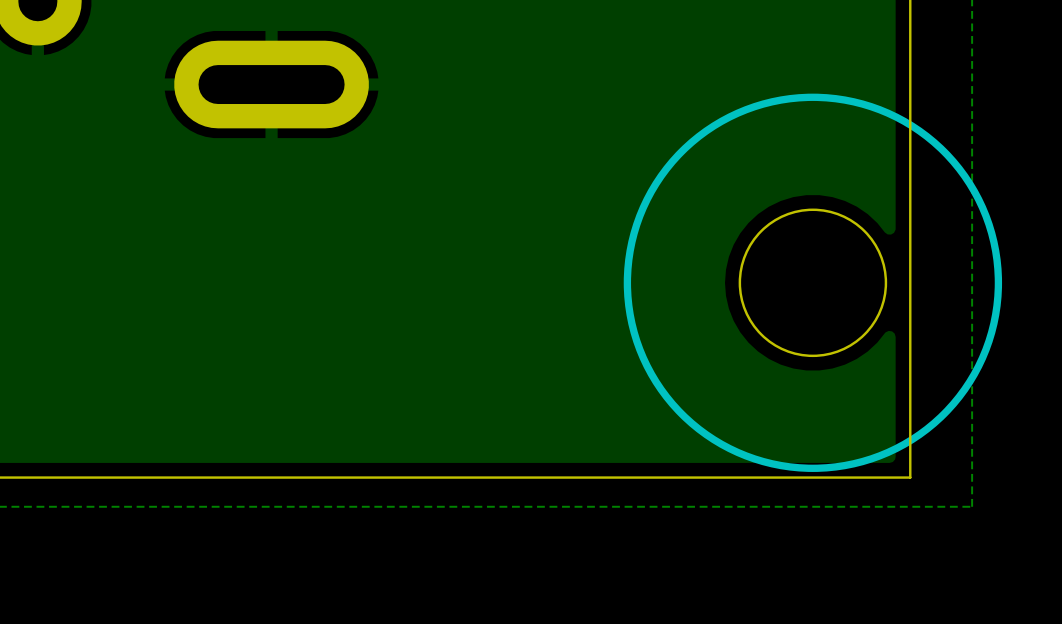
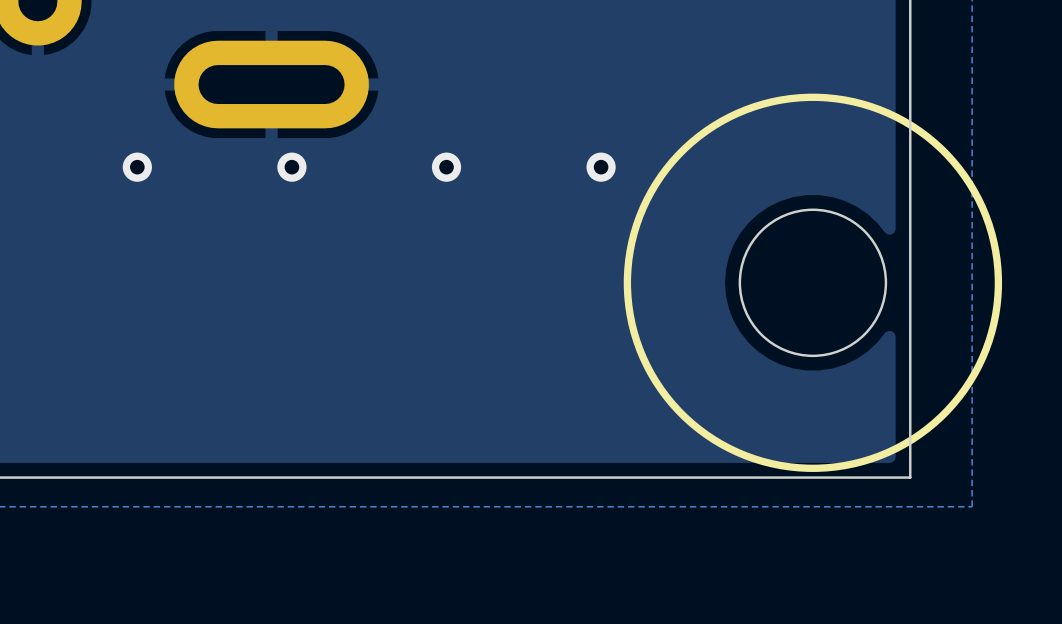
via: none -> (137, 167)
via: none -> (291, 167)
via: none -> (446, 167)
via: none -> (601, 167)

